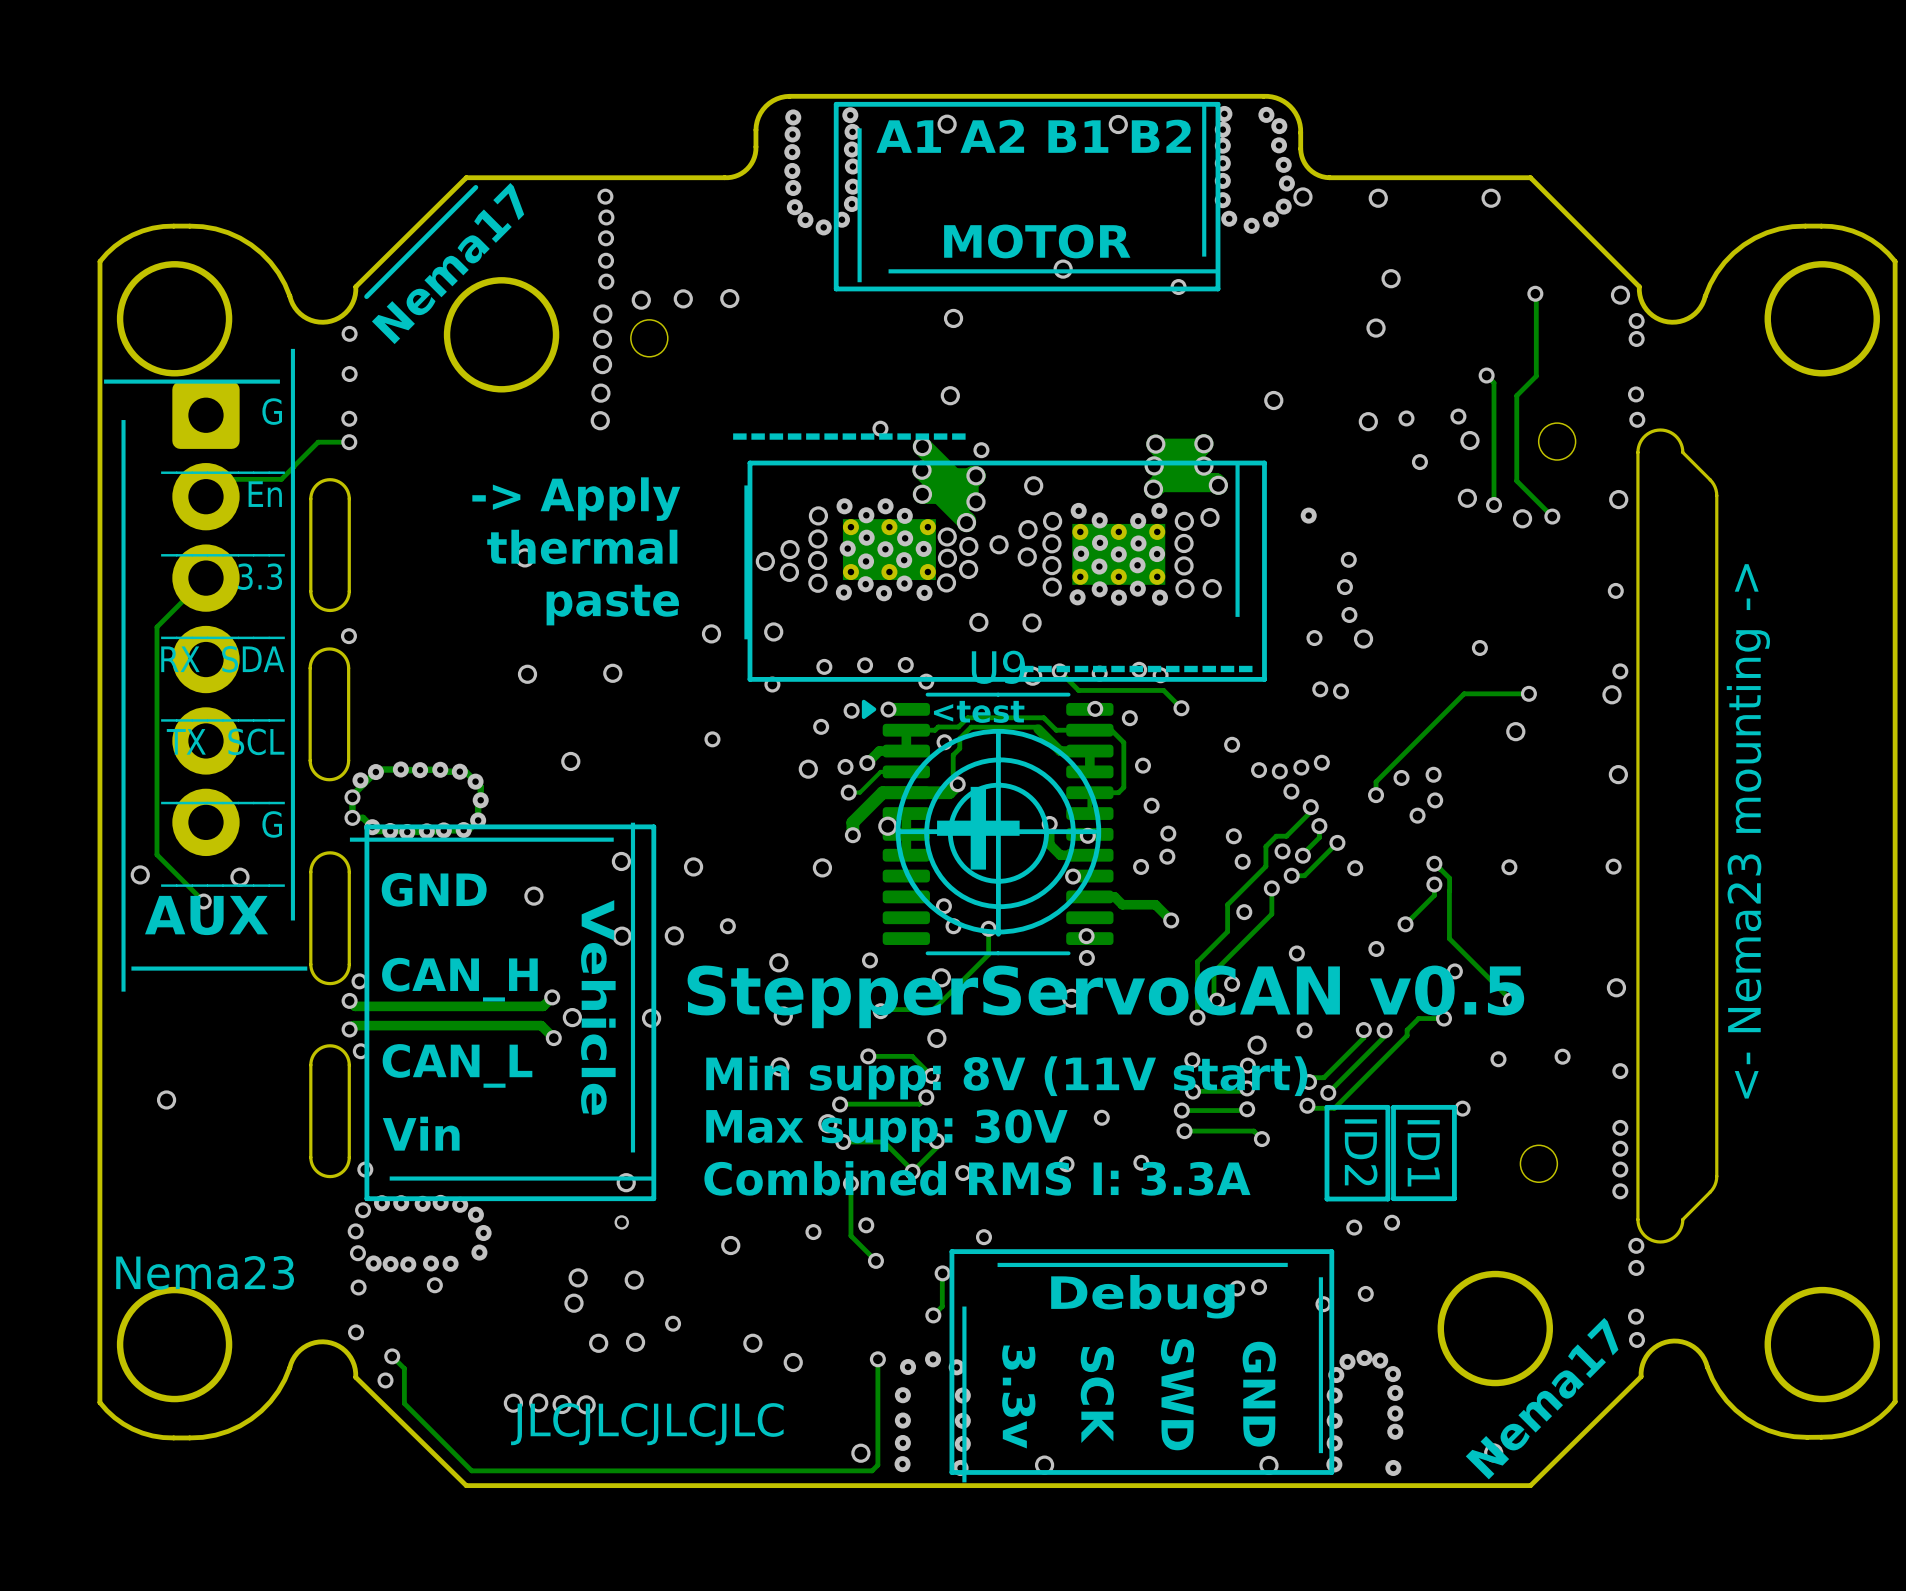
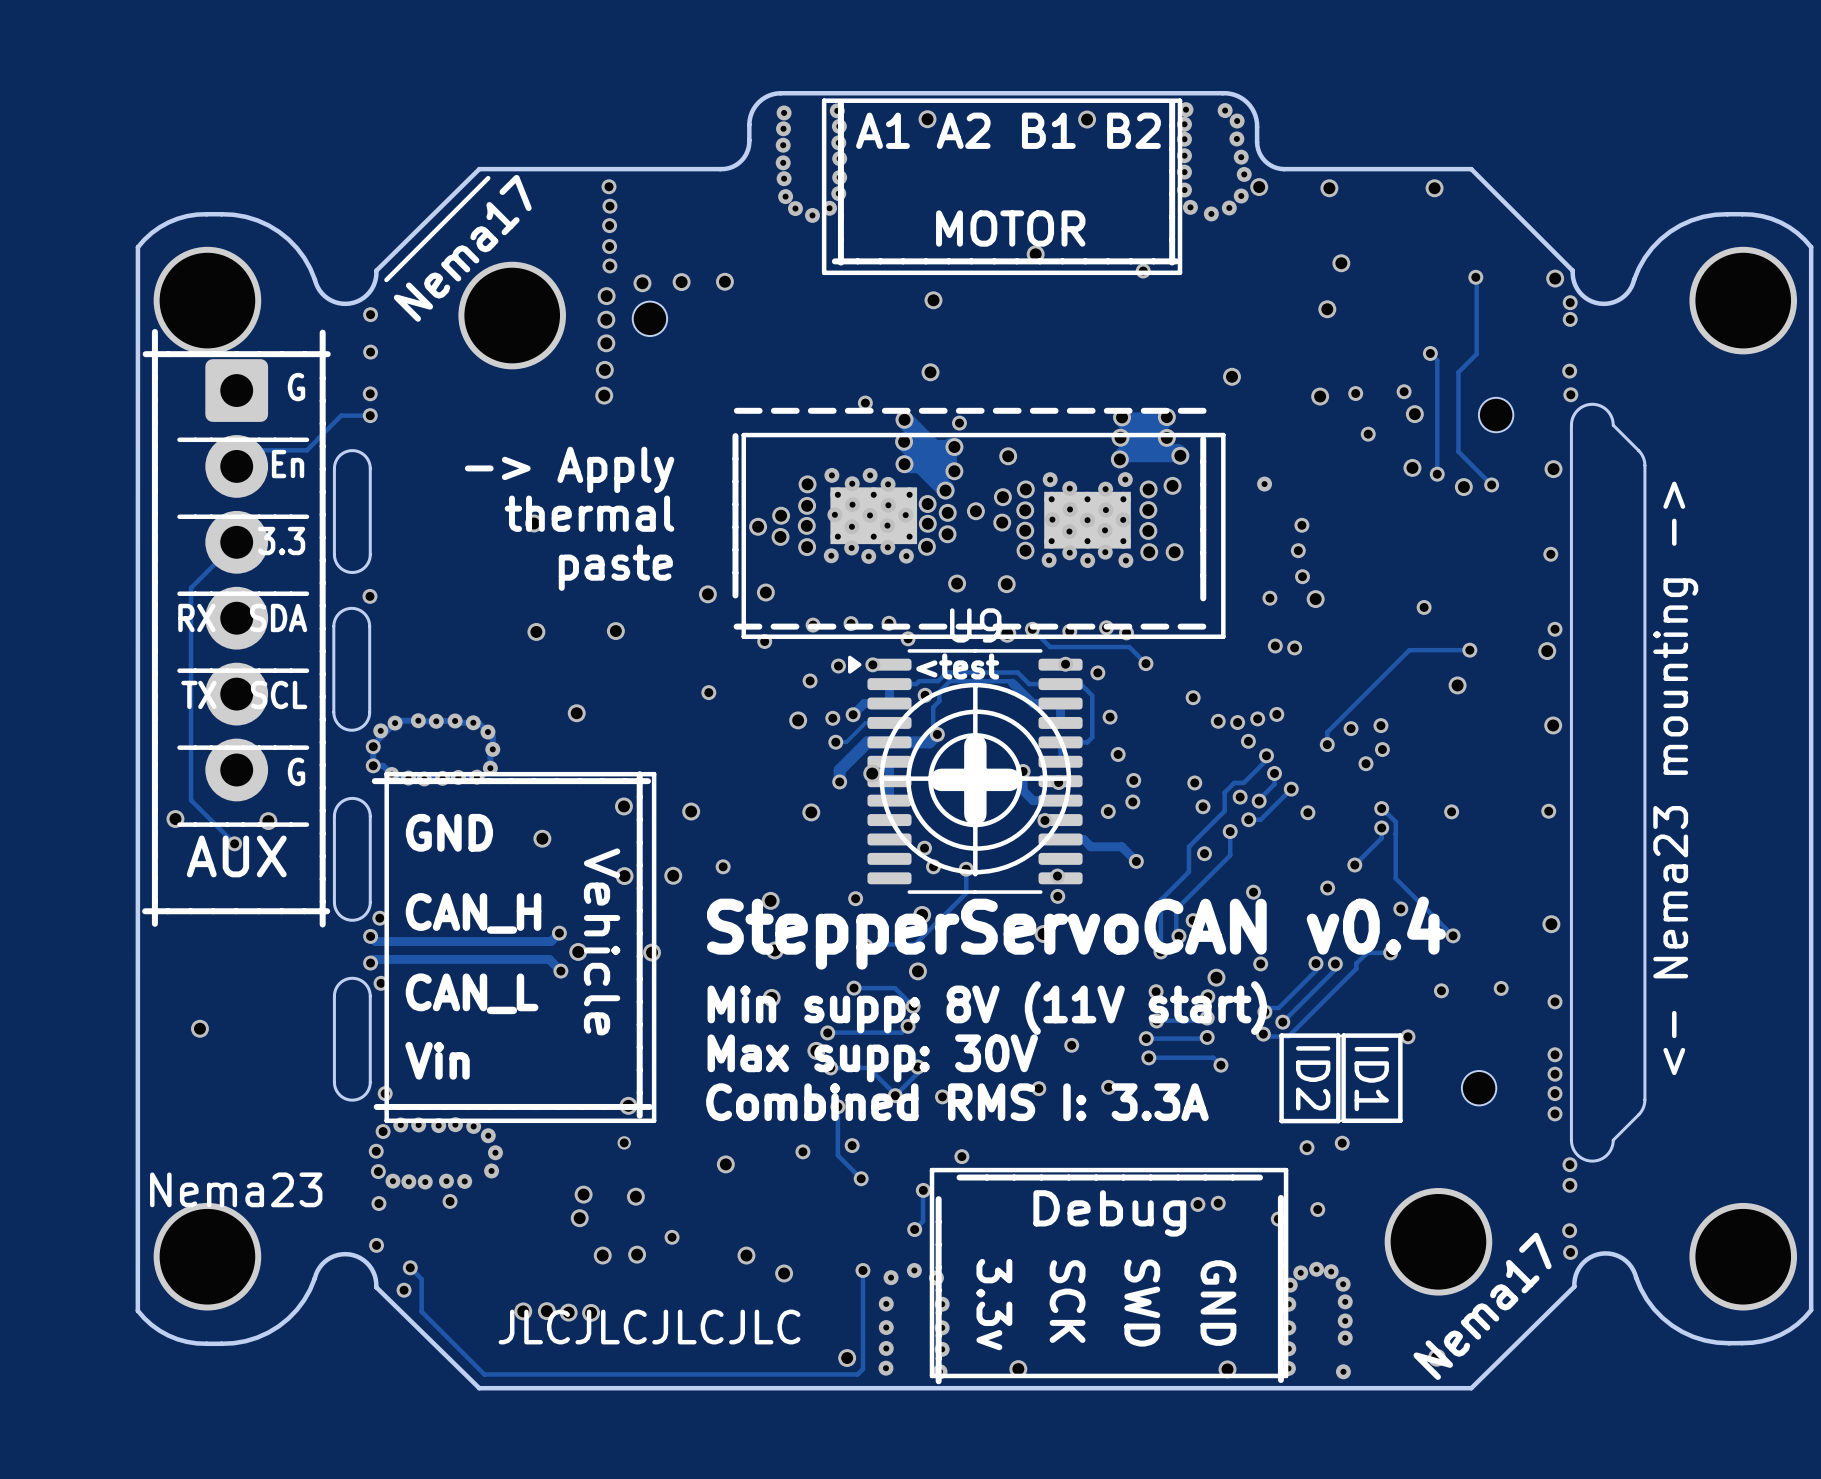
text: StepperServoCAN v0.5 (1105, 996) -> StepperServoCAN v0.4 (1076, 933)

